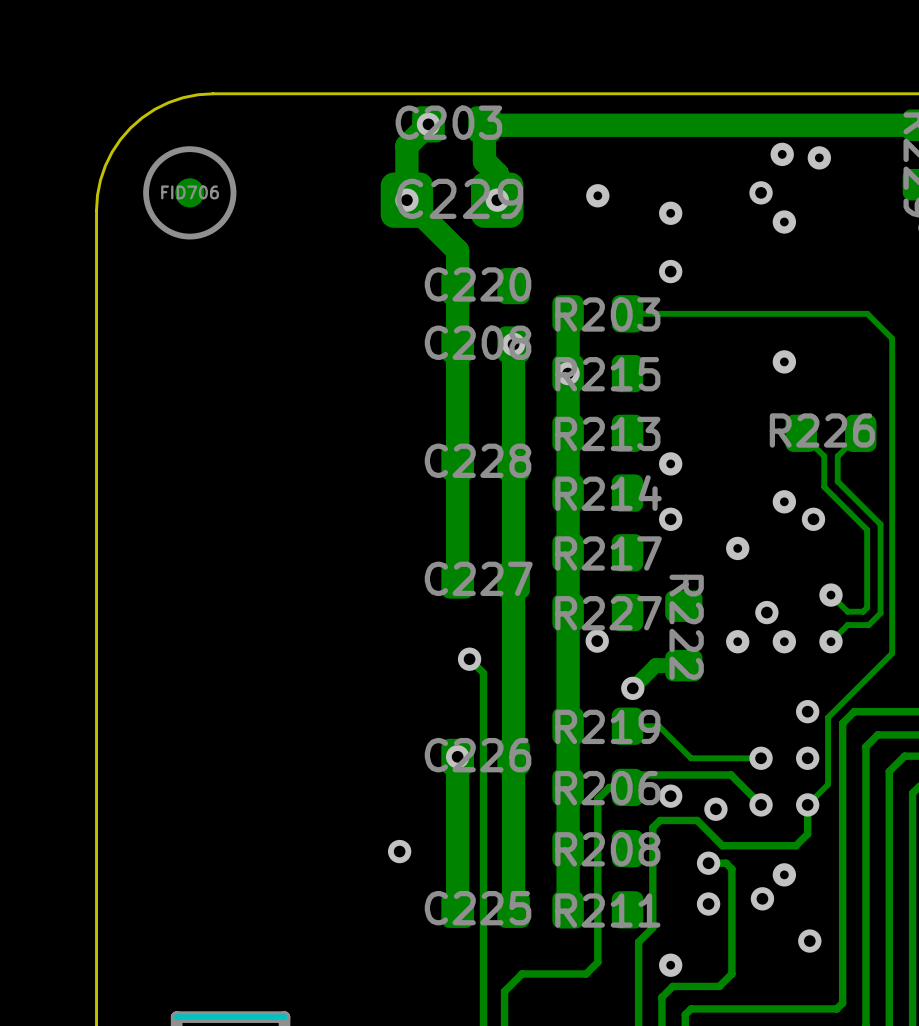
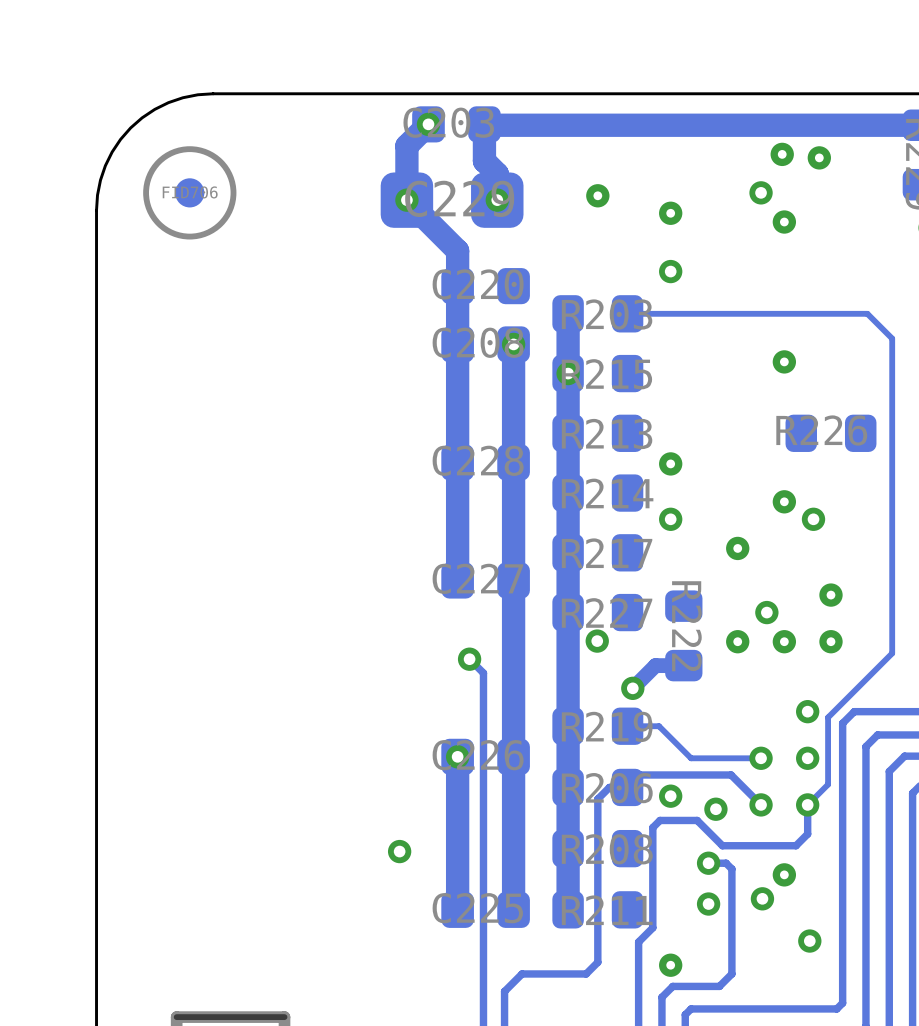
track: (801, 433) (824, 456) (824, 487) (867, 529) (867, 607) (863, 611) (847, 611) (830, 595) -> none
track: (860, 433) (837, 456) (837, 481) (880, 524) (880, 613) (868, 625) (847, 625) (830, 641) -> none

